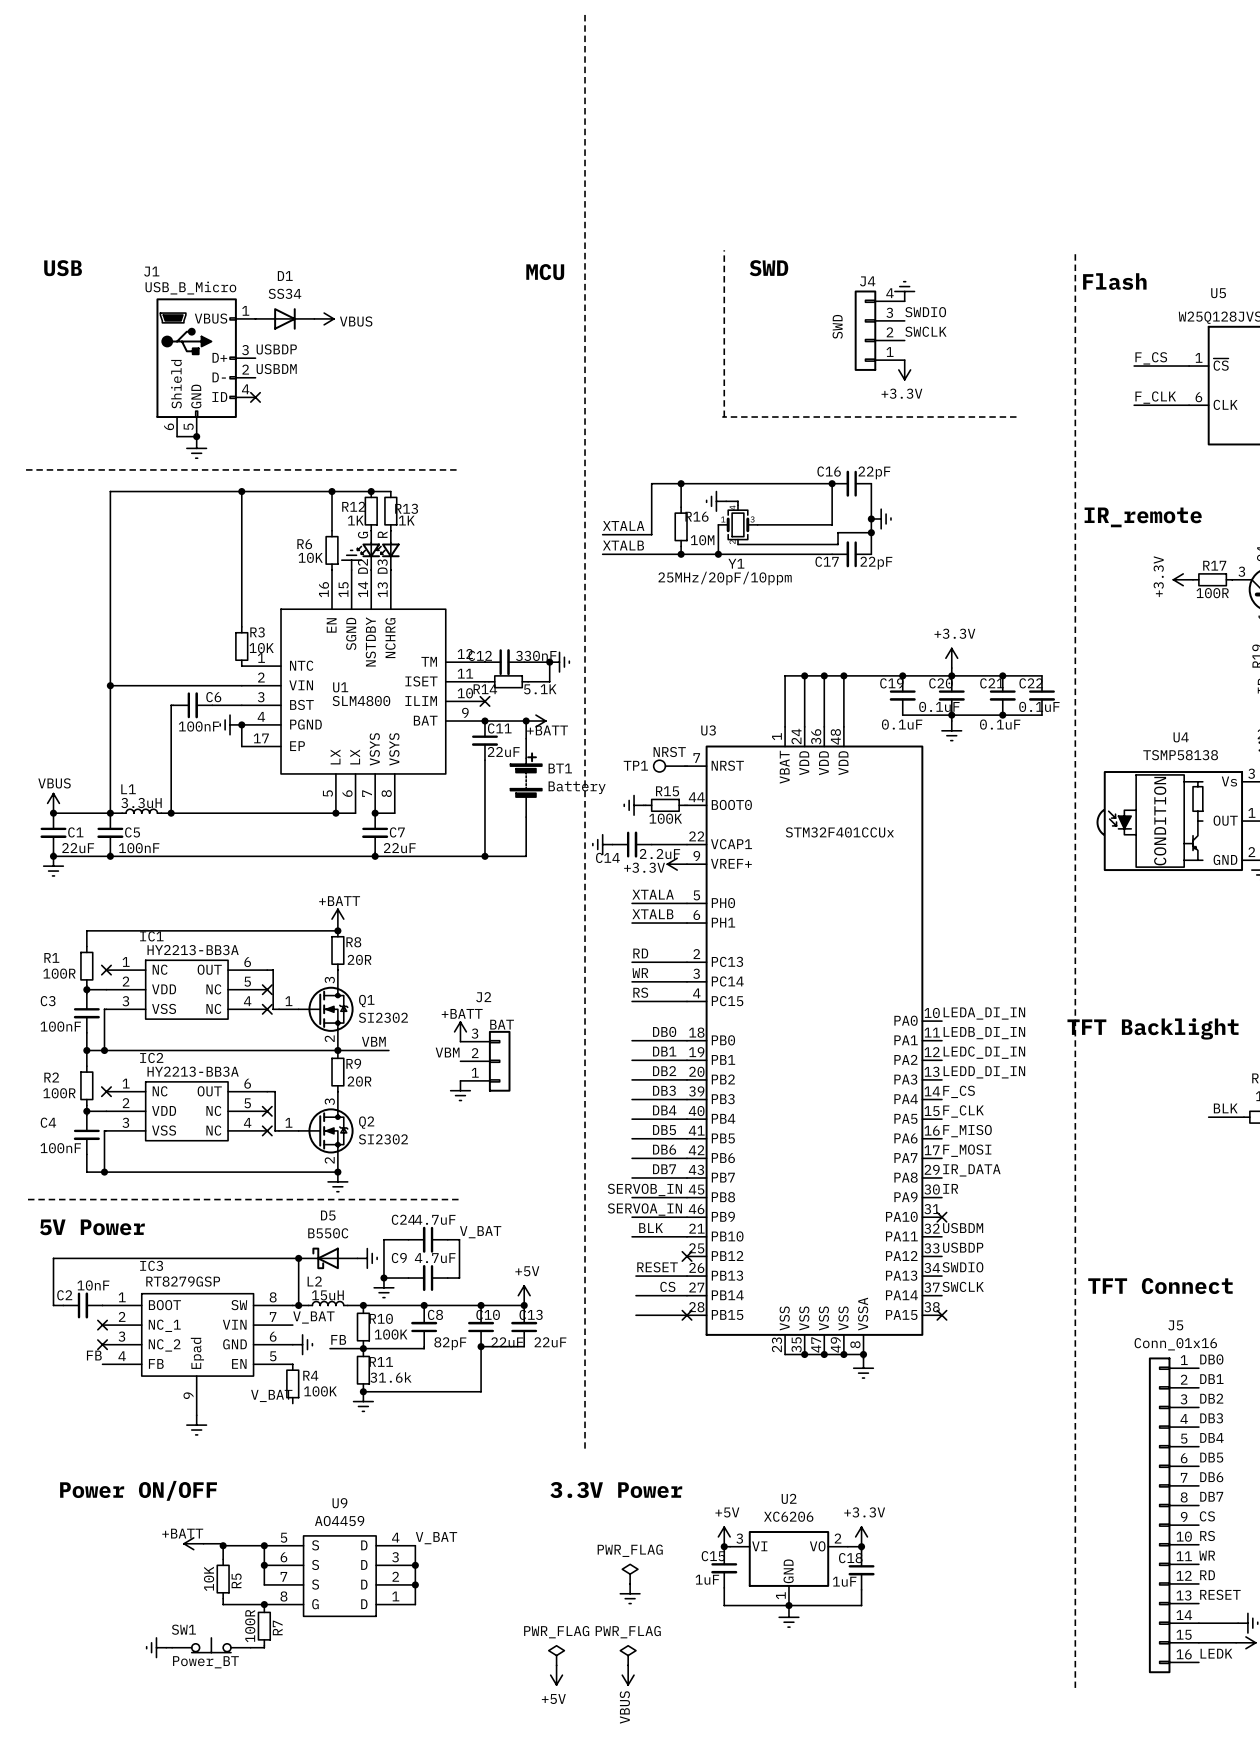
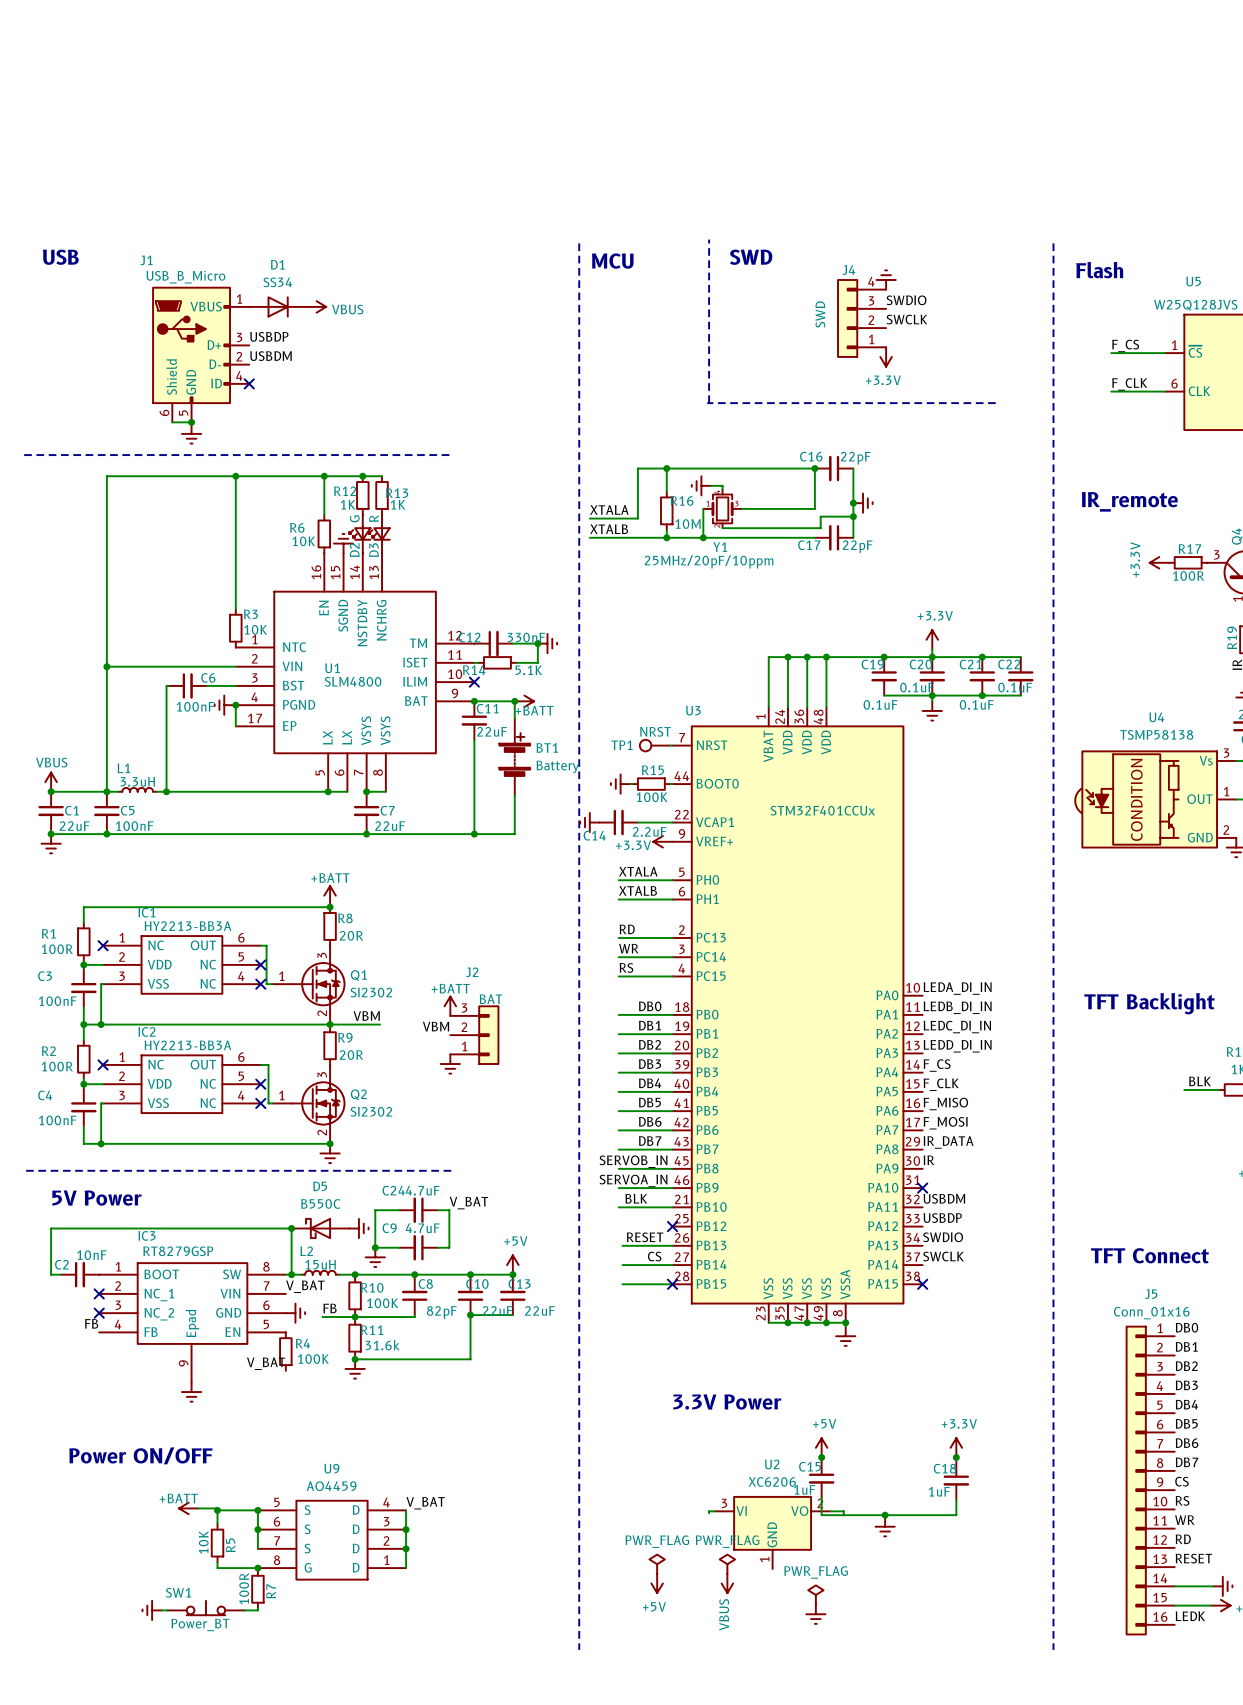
line: (585, 14) (585, 1448) -> none
line: none -> (579, 243) (579, 1649)
text position: MCU (545, 272) -> MCU (612, 261)
power symbol: none -> +5V (821, 1447)
text position: 3.3V Power (616, 1490) -> 3.3V Power (727, 1401)
junction: none -> (821, 1457)
junction: none -> (956, 1457)
power symbol: +5V (724, 1536) -> none
power symbol position: +3.3V (861, 1536) -> +3.3V (956, 1447)
junction: (724, 1546) -> none
junction: (861, 1546) -> none
junction: none -> (885, 1515)
power symbol: none -> (885, 1526)
C15 position: (724, 1568) -> (821, 1478)
C18 position: (861, 1570) -> (956, 1480)
power symbol: PWR_FLAG (630, 1574) -> none
wire: (724, 1587) (724, 1605) (861, 1605) (861, 1589) -> (821, 1497) (821, 1515) (956, 1515) (956, 1499)
power symbol: (630, 1593) -> none
power symbol: none -> PWR_FLAG (657, 1564)
power symbol: none -> PWR_FLAG (727, 1564)
junction: (788, 1605) -> none
power symbol position: (788, 1617) -> (815, 1614)
power symbol: none -> +5V (657, 1583)
power symbol: none -> PWR_FLAG (815, 1595)
power symbol: PWR_FLAG (556, 1655) -> none
power symbol: PWR_FLAG (628, 1655) -> none
power symbol: +5V (556, 1675) -> none
power symbol position: VBUS (628, 1675) -> VBUS (727, 1583)

